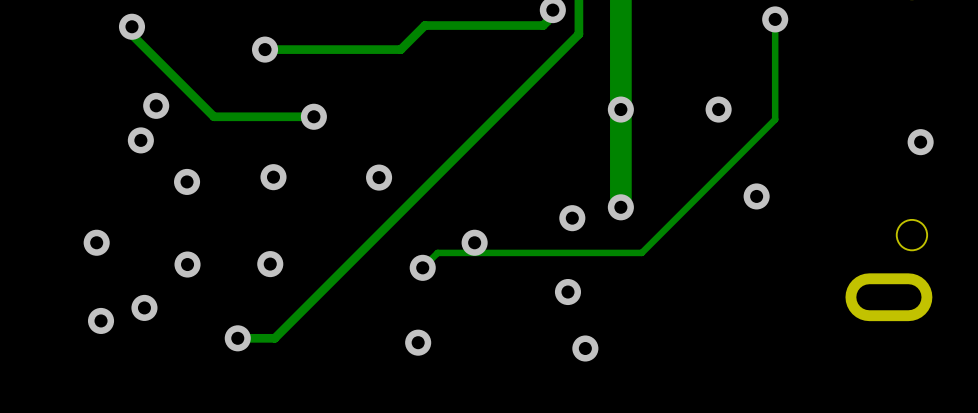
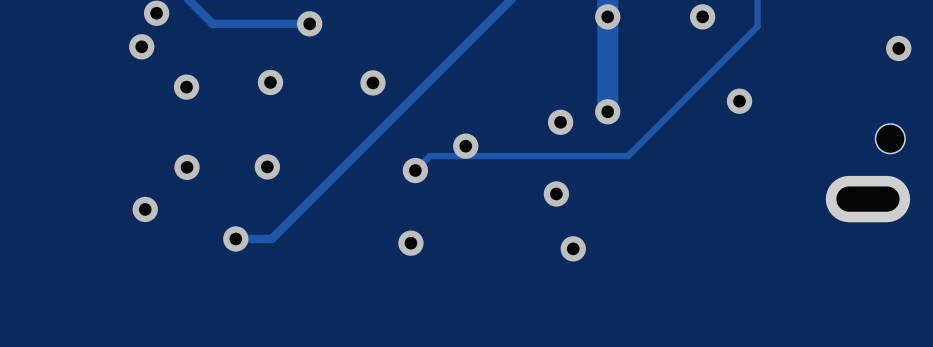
via: (96, 242) -> none
via: (101, 320) -> none

